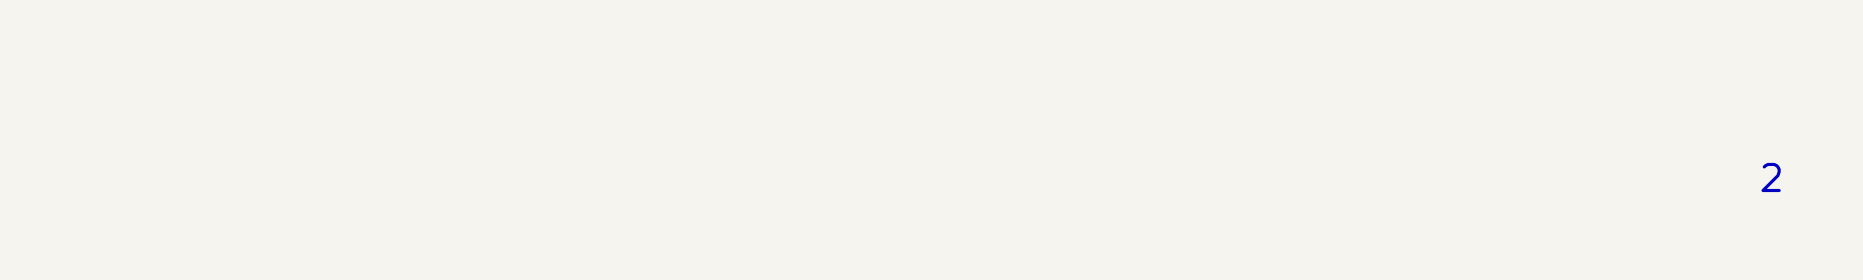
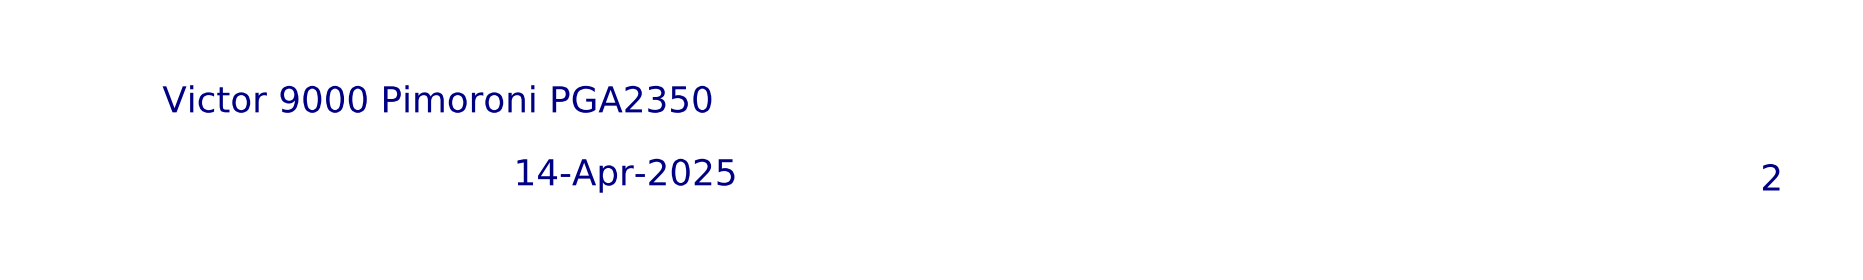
text: none -> Victor 9000 Pimoroni PGA2350 (436, 99)
text: none -> 14-Apr-2025 (625, 175)

